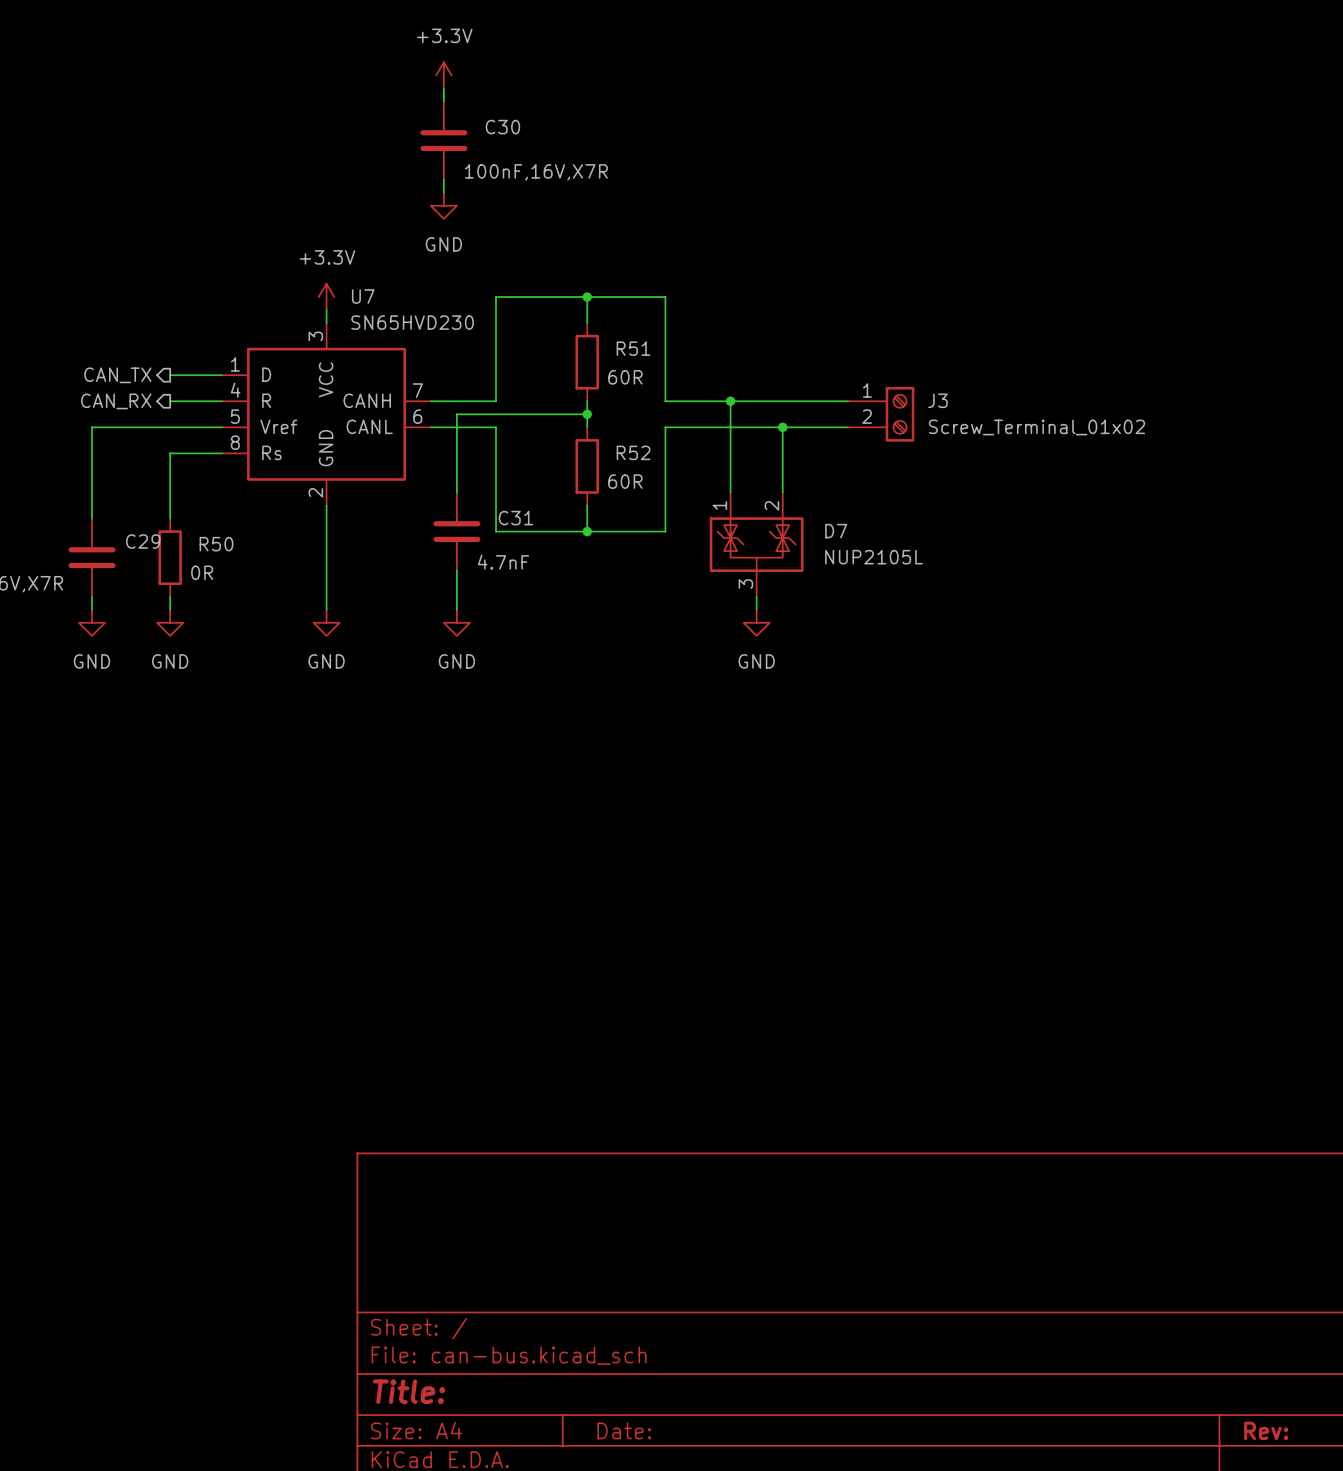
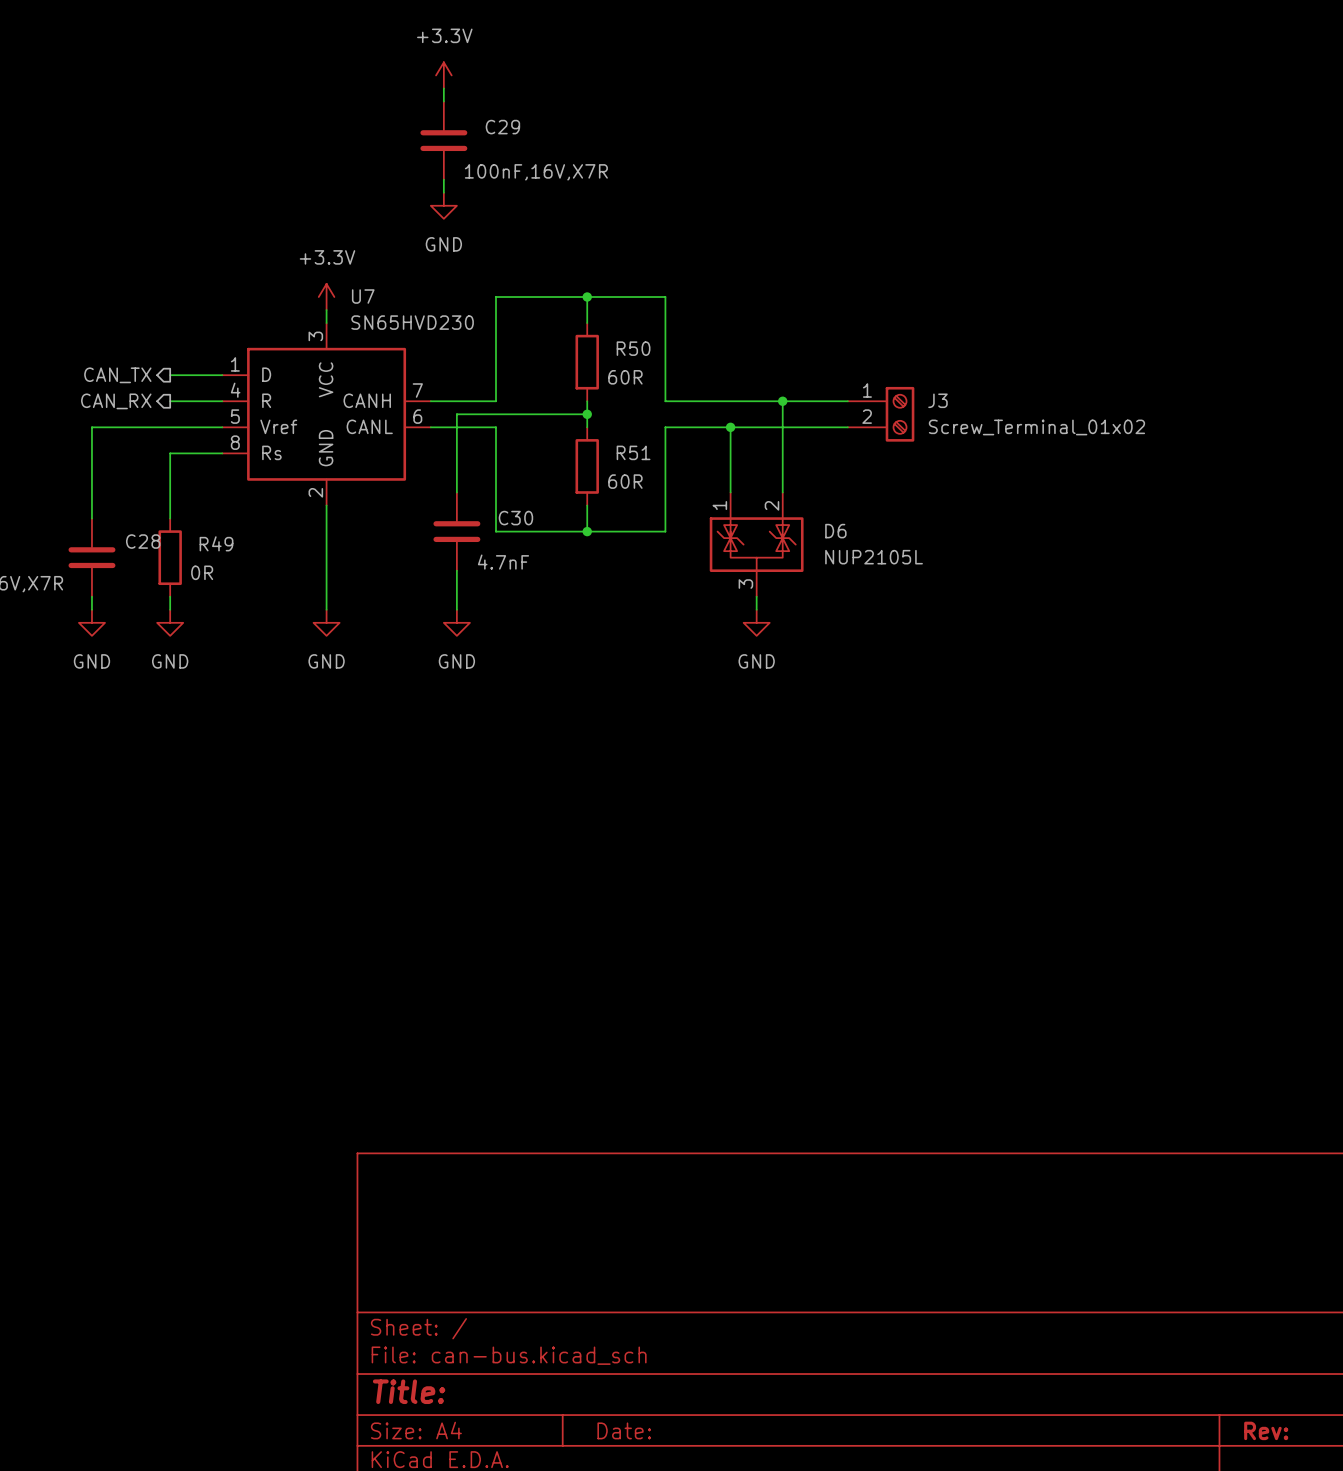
C30 name: C30 (502, 127) -> C29 (502, 127)
R51 name: R51 (633, 348) -> R50 (633, 348)
wire: (730, 401) (730, 427) -> (782, 401) (782, 427)
junction: (730, 401) -> none
junction: none -> (782, 401)
junction: none -> (730, 427)
junction: (782, 427) -> none
R52 name: R52 (633, 452) -> R51 (633, 452)
C31 name: C31 (515, 518) -> C30 (515, 518)
D7 name: D7 (836, 531) -> D6 (835, 531)
C29 name: C29 (143, 541) -> C28 (143, 541)
R50 name: R50 (216, 544) -> R49 (216, 543)

